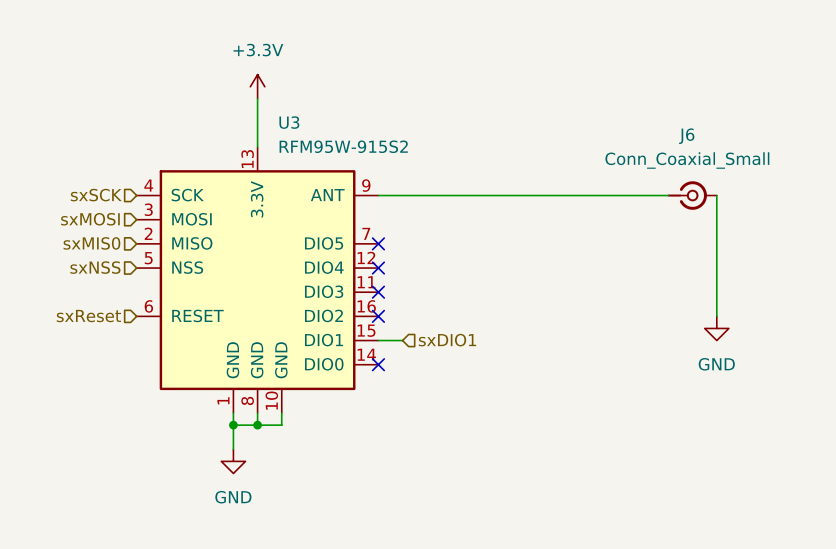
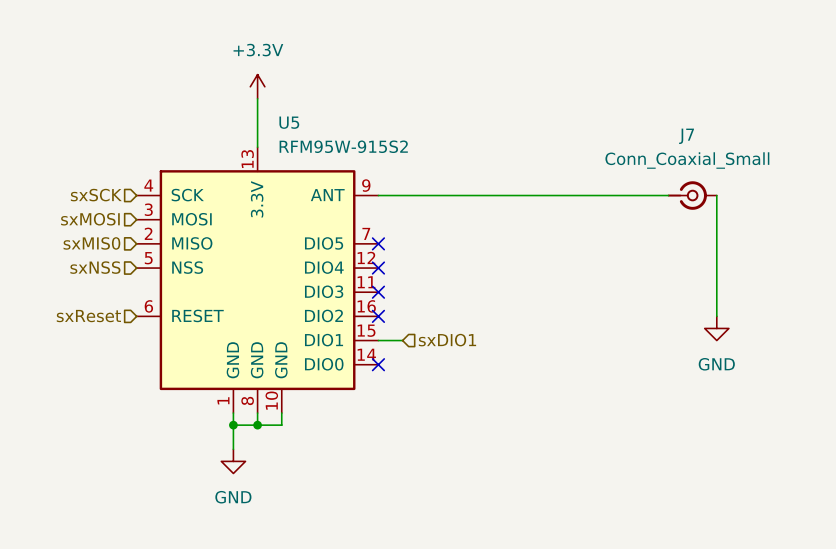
U3 name: U3 (289, 122) -> U5 (289, 122)
J6 name: J6 (686, 136) -> J7 (686, 136)

